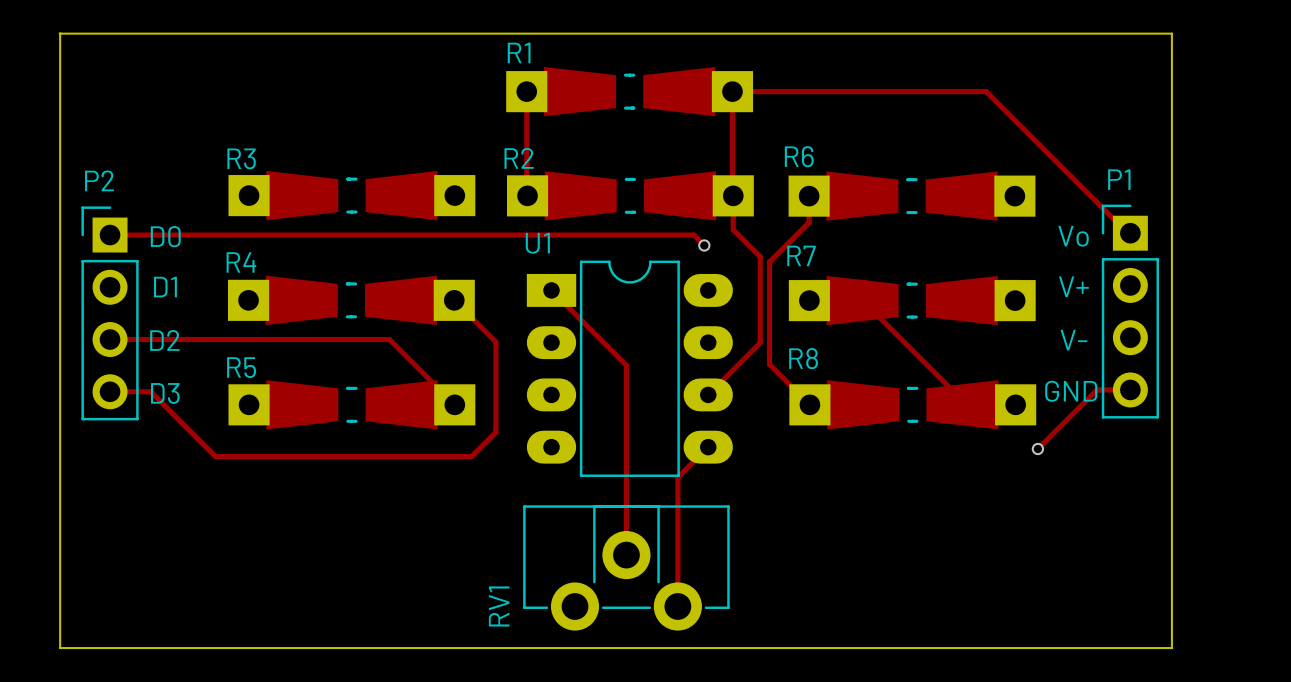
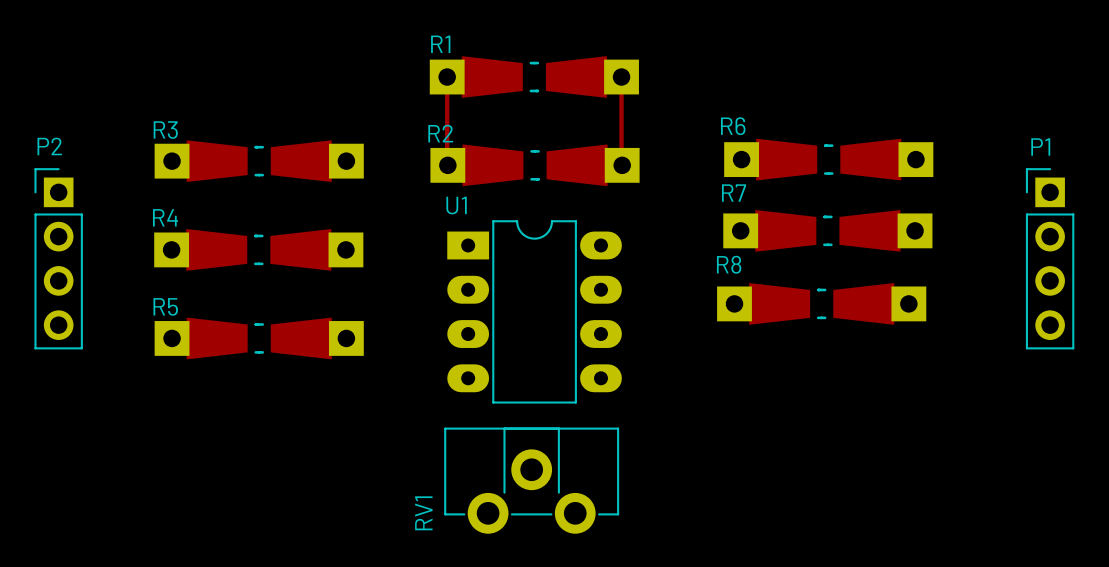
board edge: (59, 33) (1171, 33) (1171, 648) (60, 648) (60, 33) -> none
track: (732, 91) (986, 91) (1127, 233) (1130, 233) -> none
R3 position: (351, 195) -> (259, 161)
track: (733, 195) (733, 229) (760, 256) (760, 342) (708, 394) -> none
track: (809, 196) (809, 222) (769, 262) (769, 364) (809, 404) (863, 404) -> none
R6 position: (912, 196) -> (828, 159)
track: (110, 235) (693, 235) (704, 245) -> none
text: D0 (165, 236) -> none
text: Vo (1073, 236) -> none
via: (704, 245) -> none
text: V+ (1073, 286) -> none
text: D1 (165, 287) -> none
track: (551, 290) (626, 365) (626, 555) -> none
R4 position: (351, 300) -> (258, 249)
track: (401, 300) (454, 300) (495, 341) (495, 432) (471, 456) (215, 456) (150, 391) (110, 391) -> none
track: (862, 300) (966, 404) -> none
R7 position: (912, 300) -> (827, 230)
P1 position: (1130, 311) -> (1050, 258)
P2 position: (110, 313) -> (58, 258)
track: (110, 339) (389, 339) (454, 404) (401, 404) -> none
text: D2 (164, 340) -> none
text: V- (1073, 340) -> none
track: (1130, 389) (1096, 389) (1037, 448) -> none
text: GND (1071, 391) -> none
text: D3 (165, 393) -> none
R5 position: (351, 404) -> (259, 338)
R8 position: (912, 404) -> (821, 303)
track: (708, 447) (677, 477) (677, 606) -> none
via: (1037, 448) -> none

